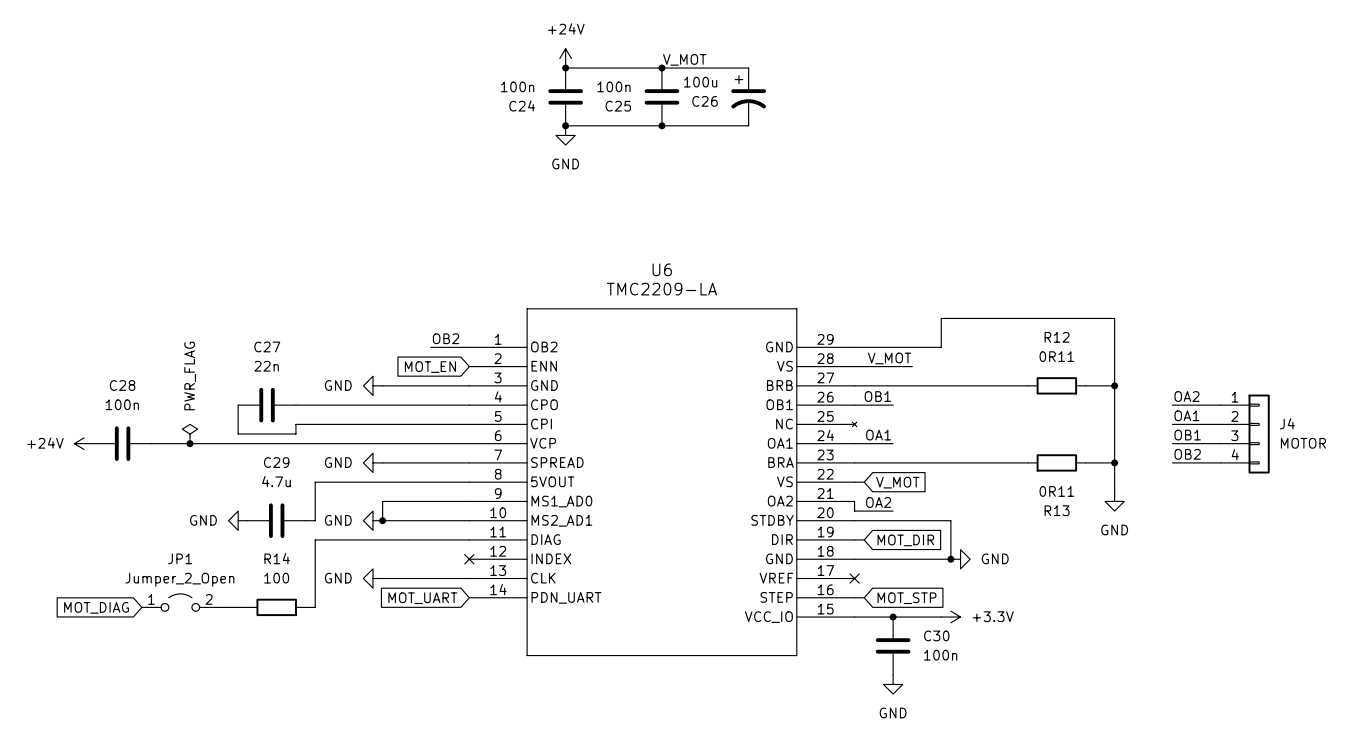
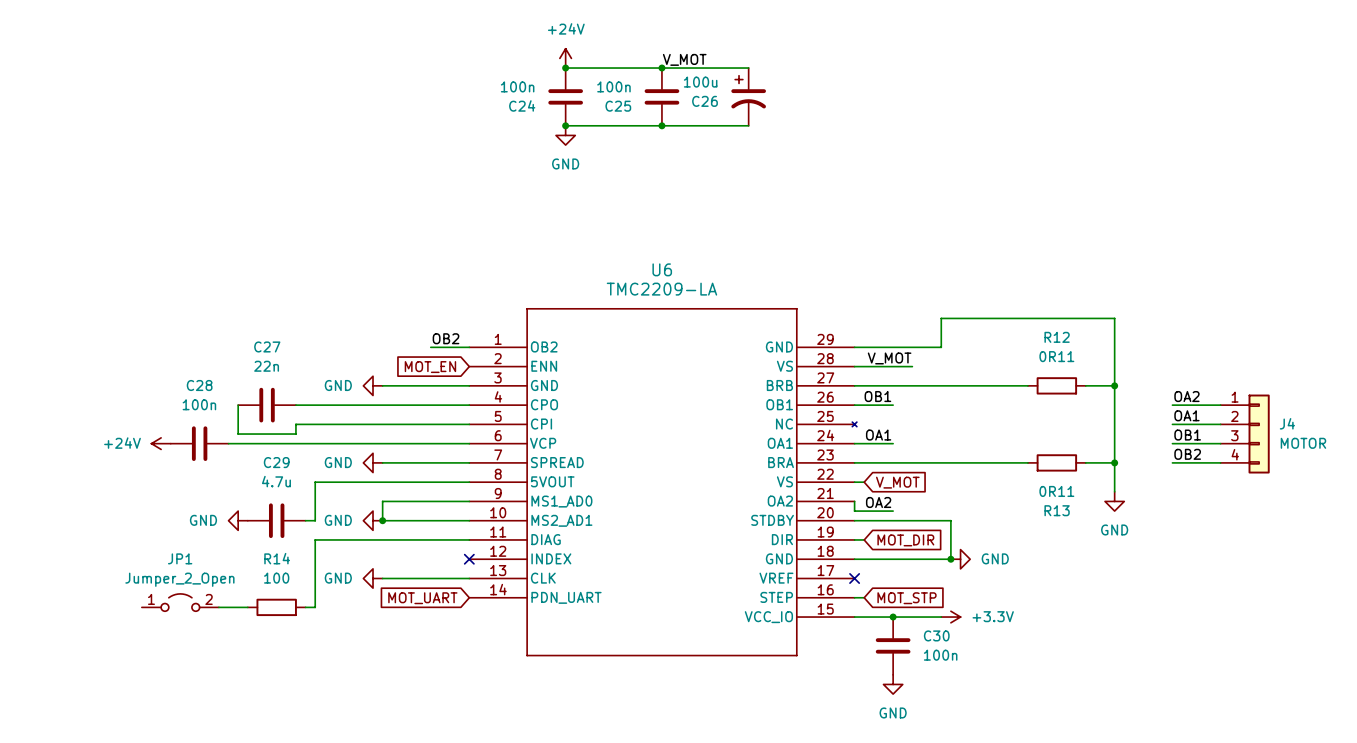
power symbol: PWR_FLAG (190, 434) -> none
power symbol position: +24V (84, 443) -> +24V (161, 443)
C28 position: (122, 443) -> (199, 443)
junction: (190, 443) -> none
global label: MOT_DIAG (96, 607) -> none

